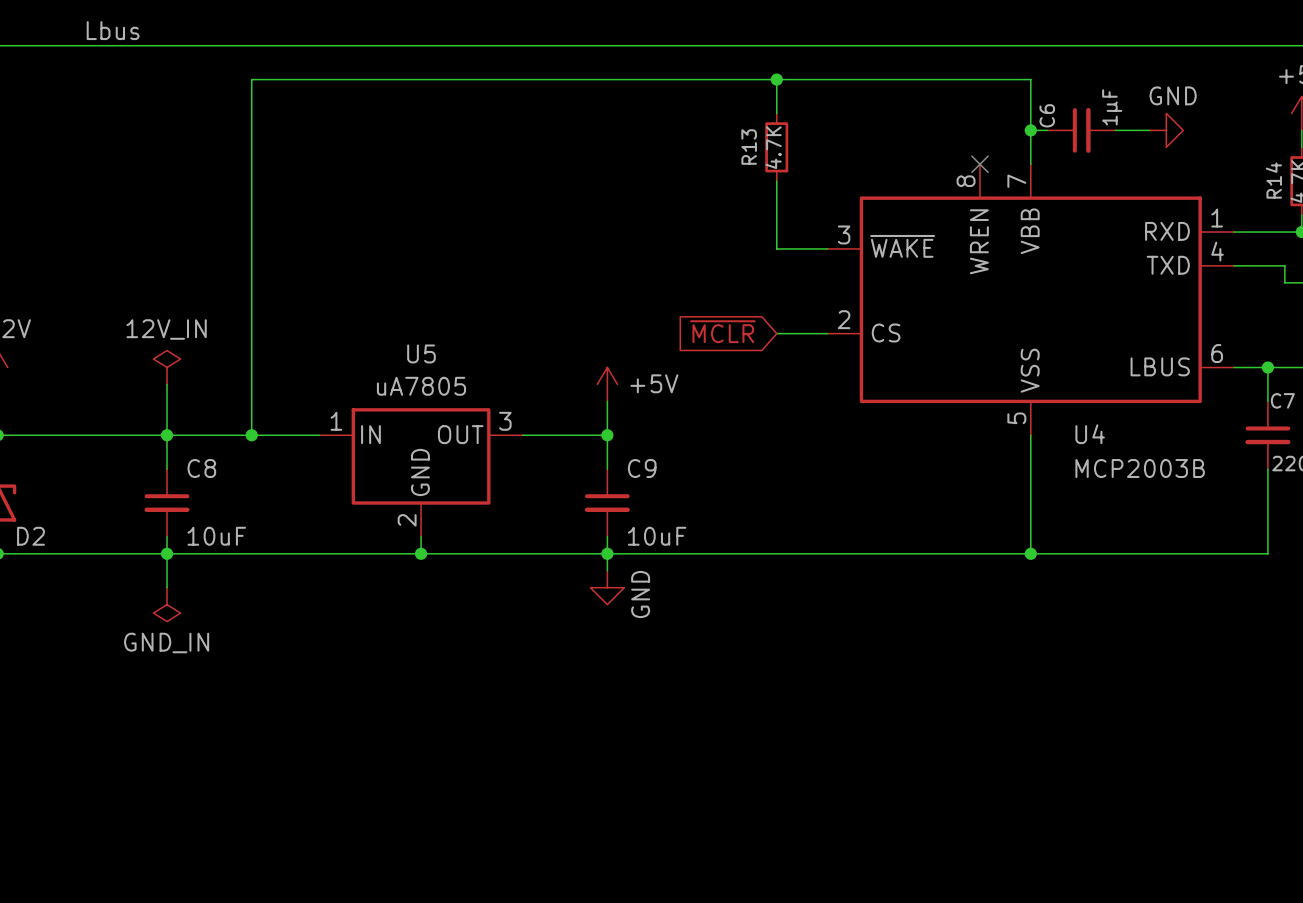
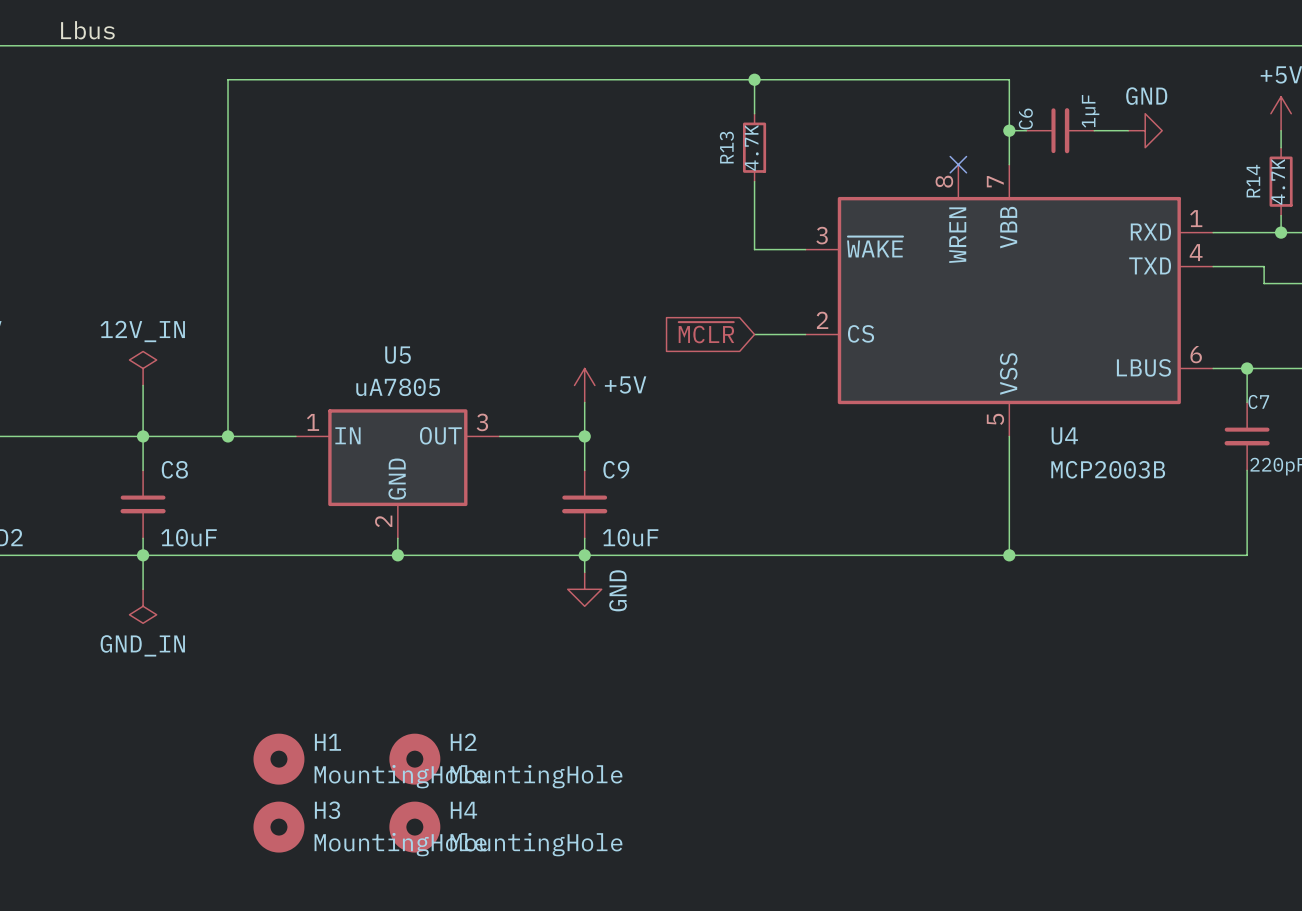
H1: none -> MountingHole (278, 759)
H2: none -> MountingHole (414, 759)
H3: none -> MountingHole (278, 827)
H4: none -> MountingHole (414, 827)

